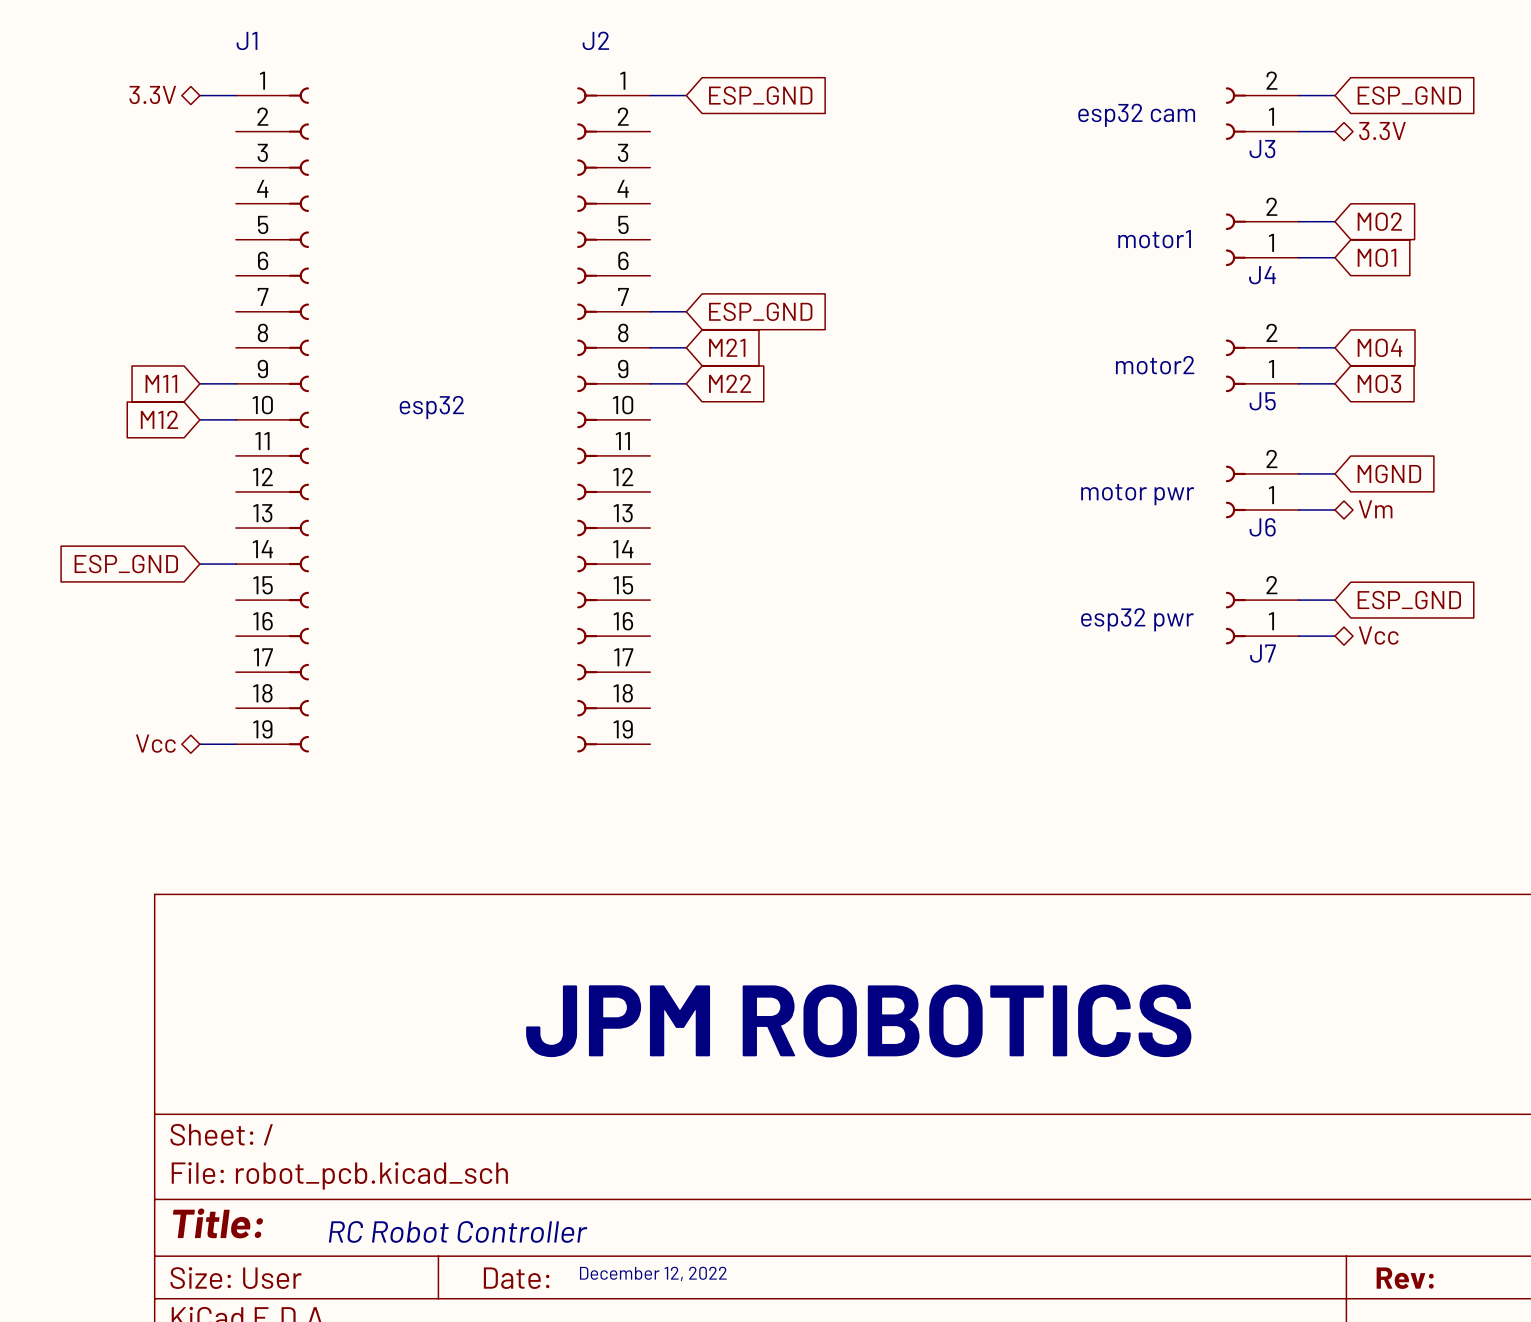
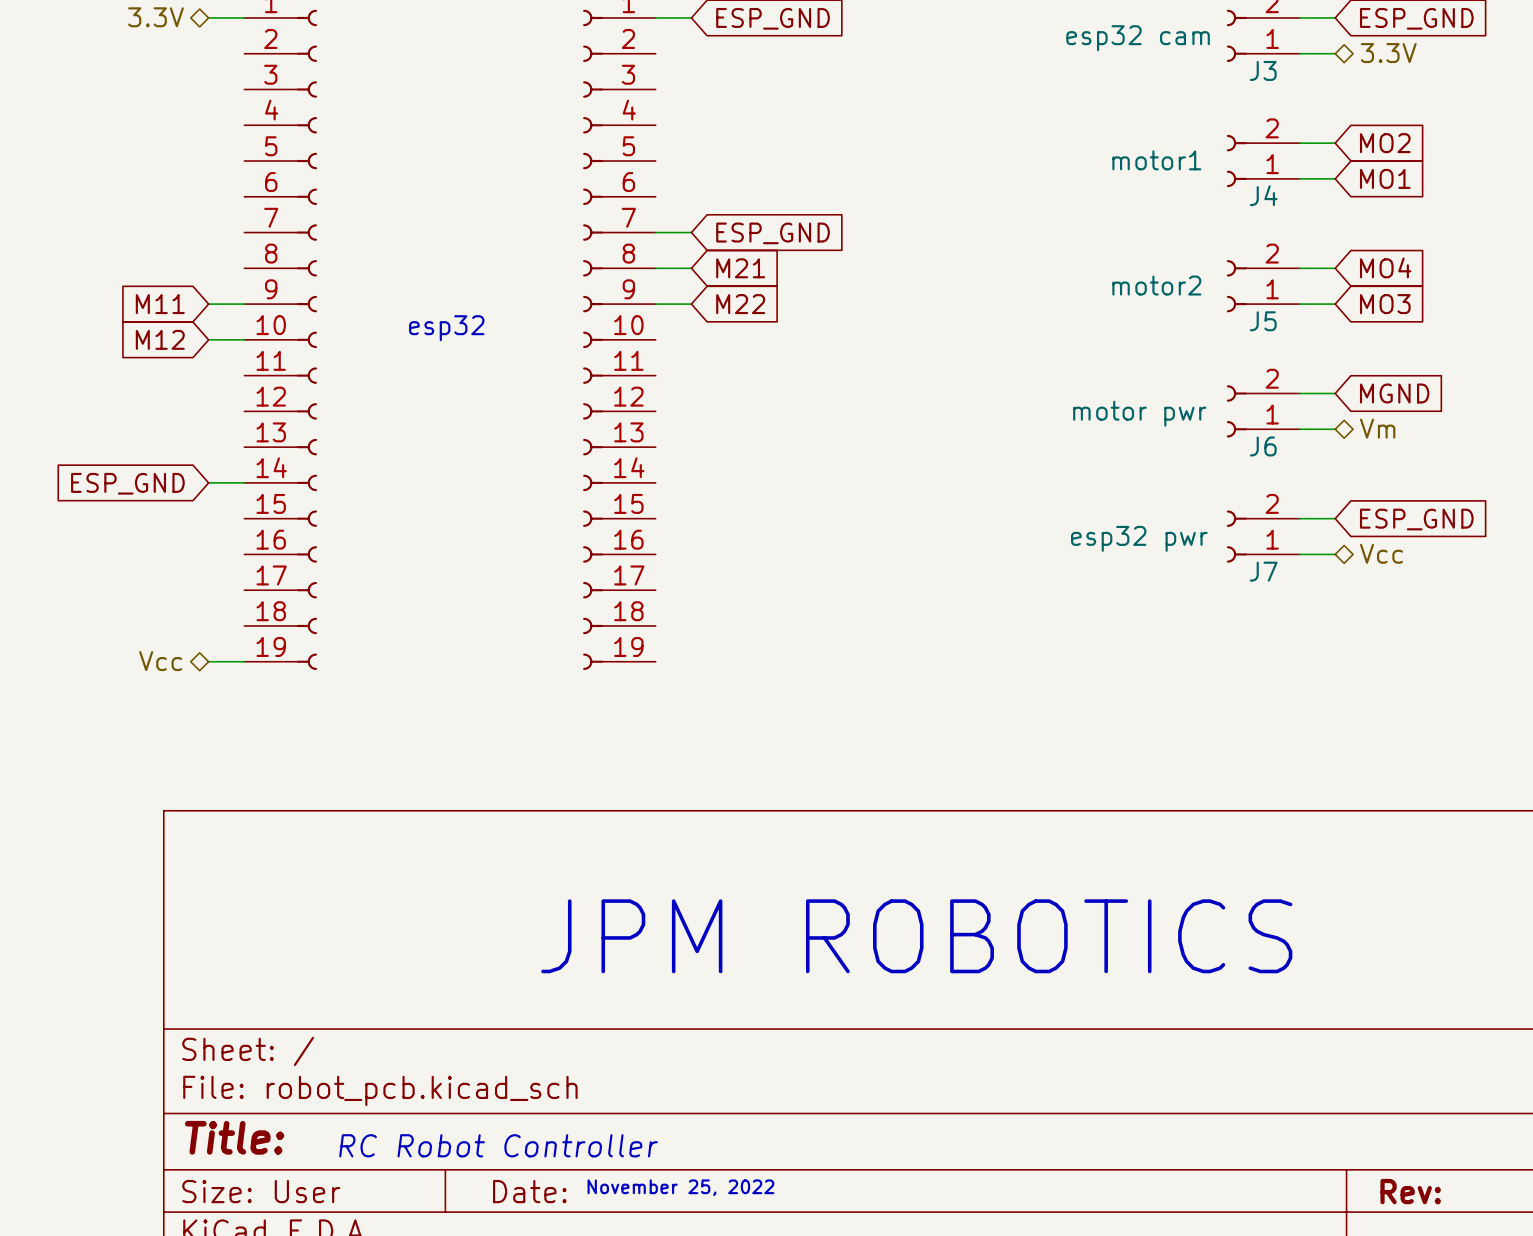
text: December 12, 2022 (653, 1273) -> November 25, 2022 (680, 1187)

